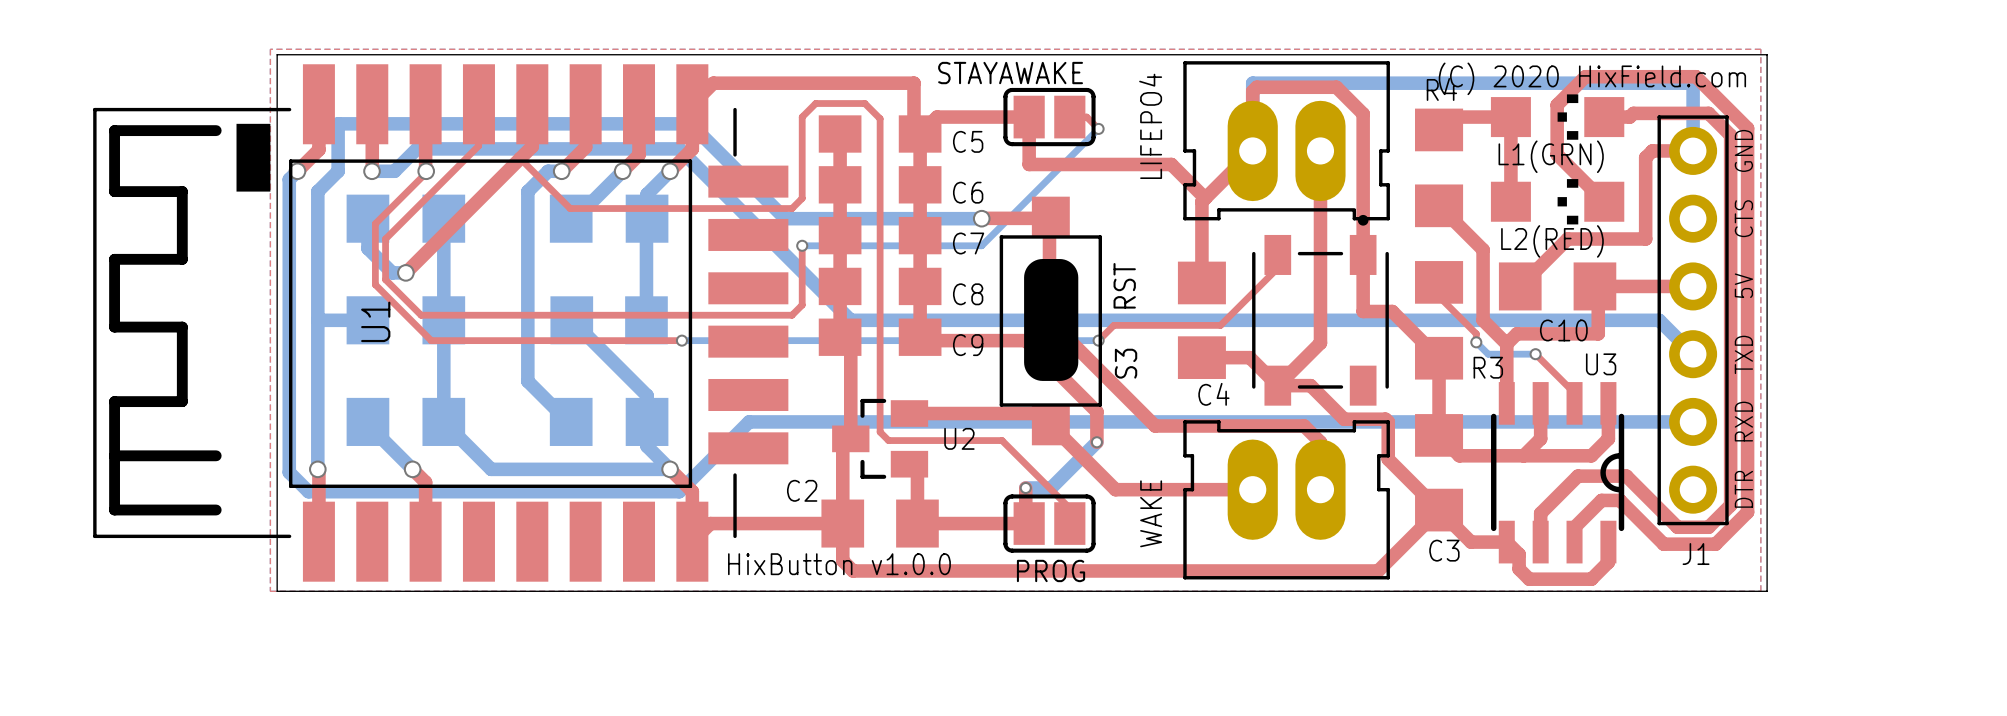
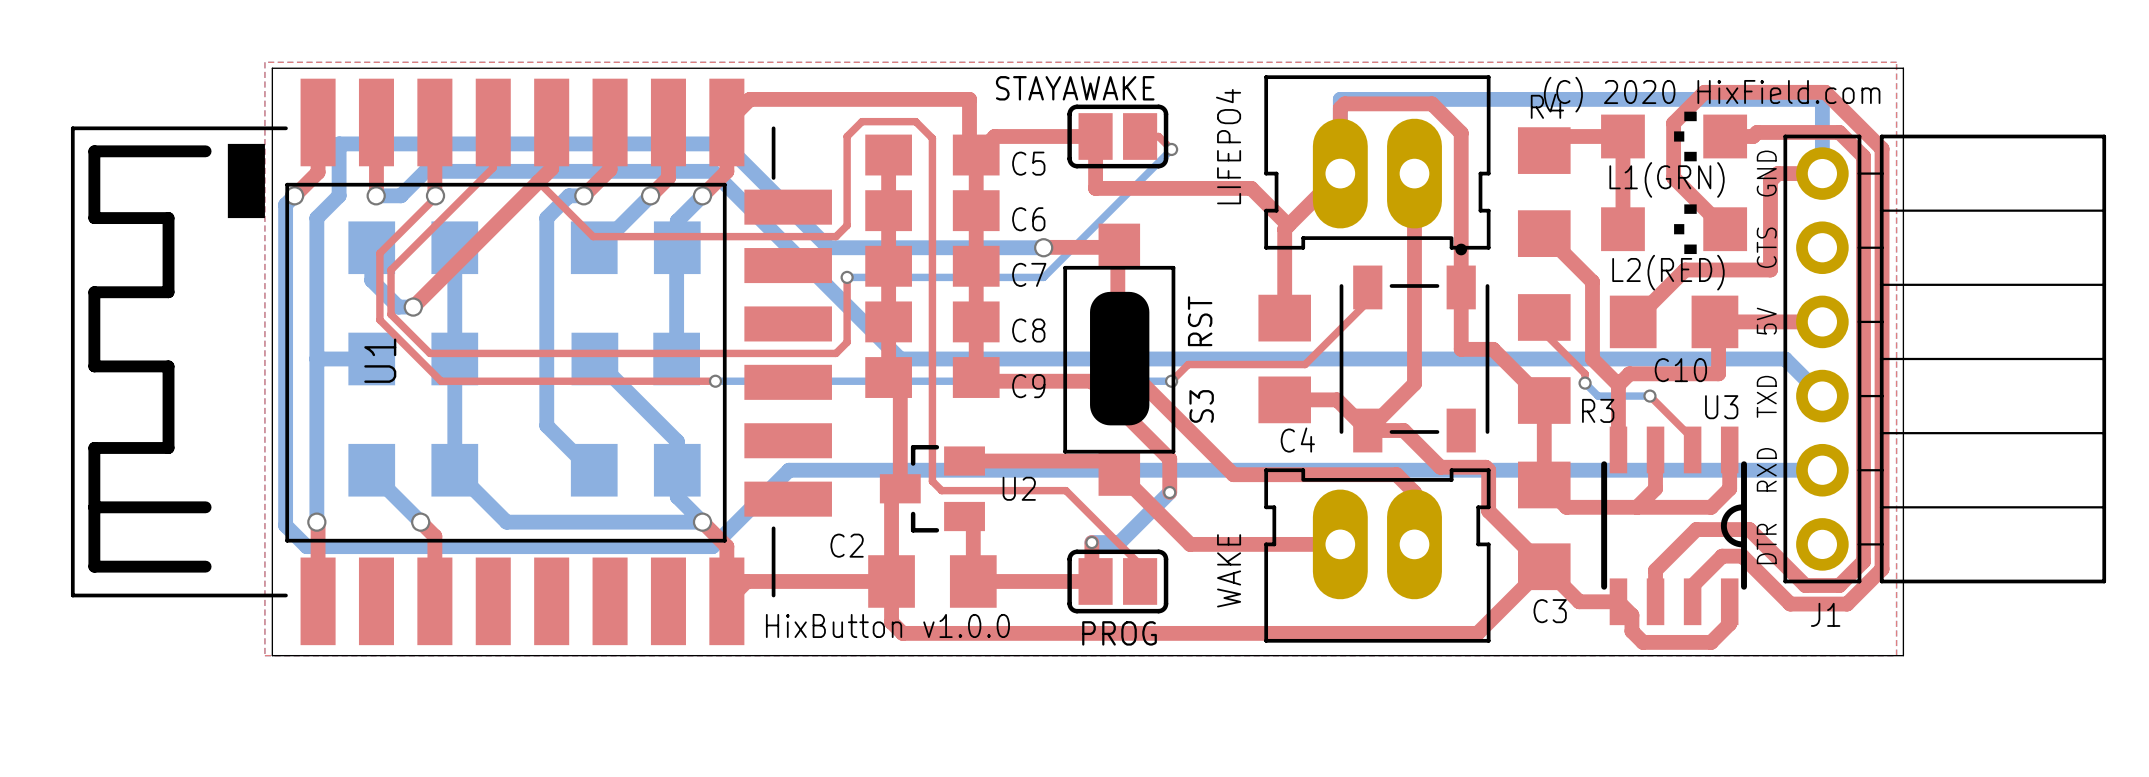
J1 footprint: [1657, 115, 1729, 526] -> [1783, 134, 2107, 584]

